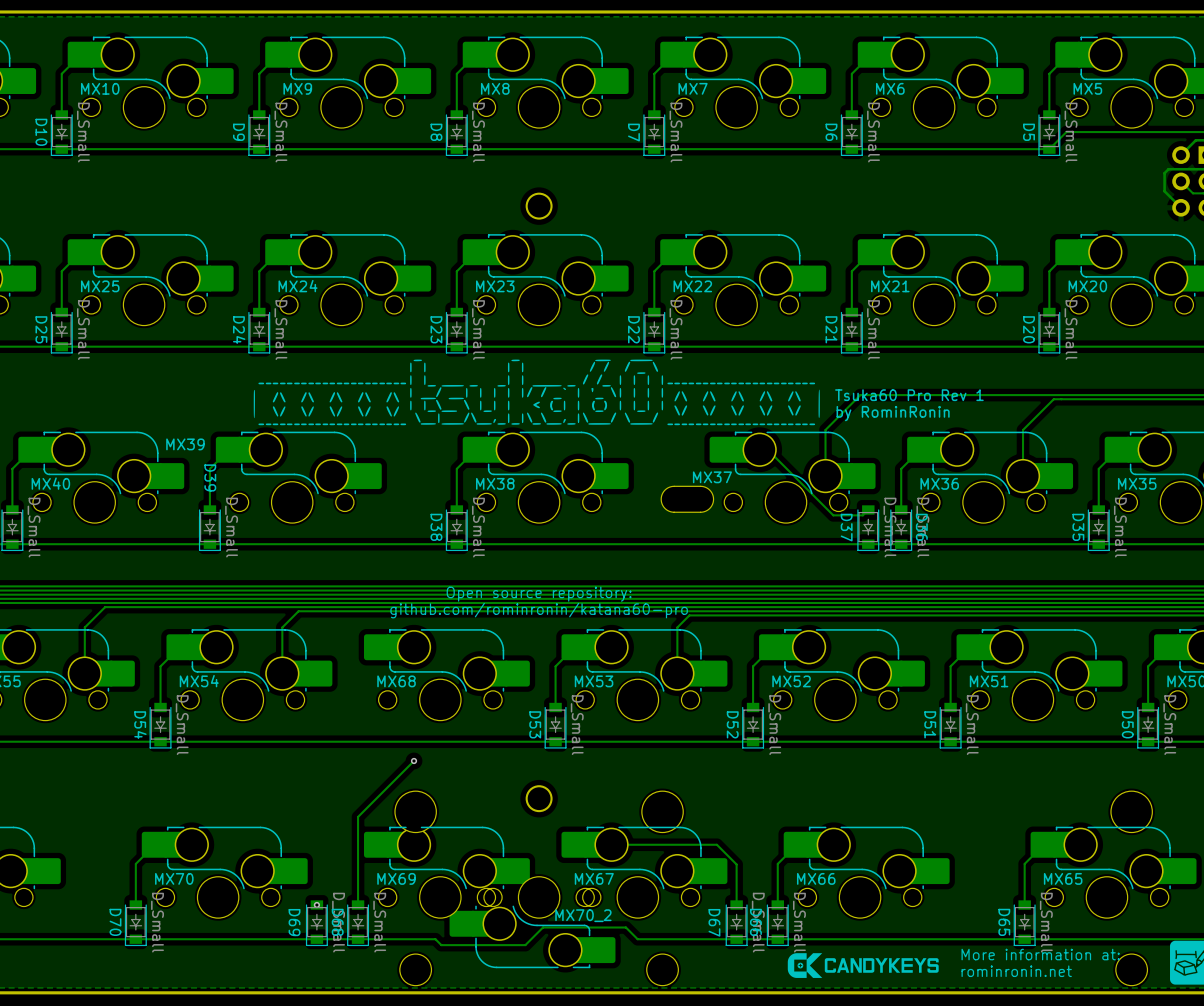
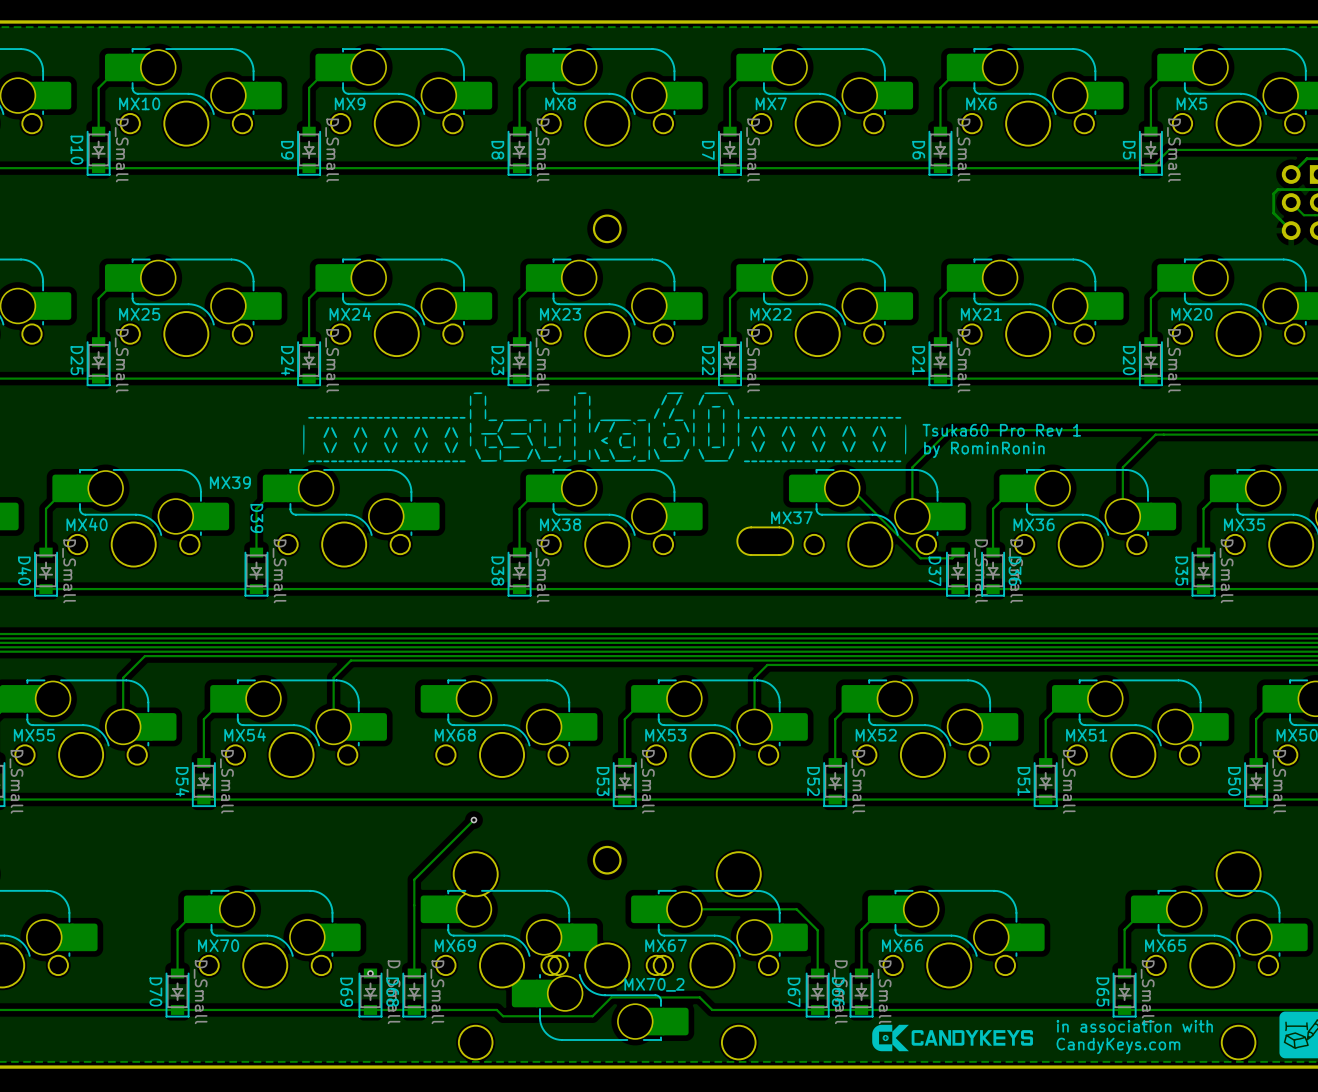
text: Open source repository: (539, 594) -> none
text: github.com/rominronin/katana60-pro (539, 610) -> none
text: More information at: (1040, 954) -> in association with (1134, 1026)
text: rominronin.net (1016, 971) -> CandyKeys.com (1118, 1045)

